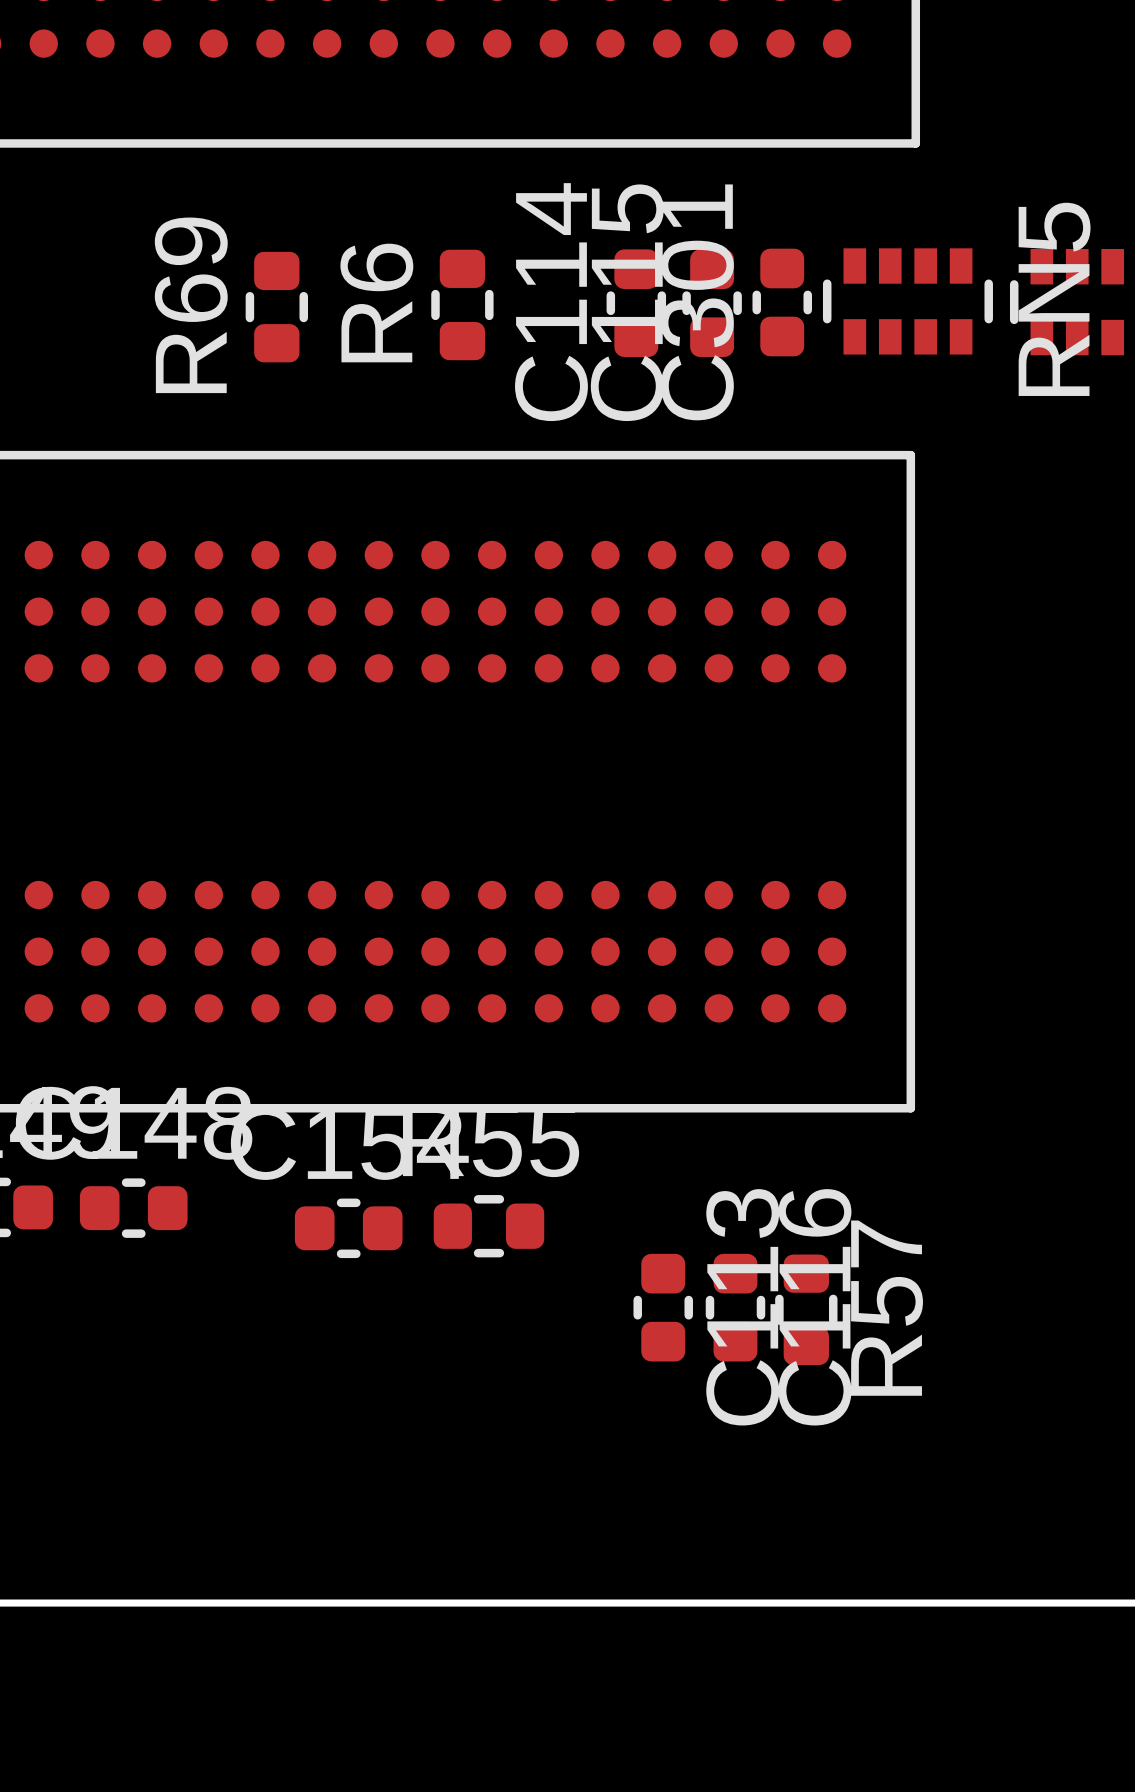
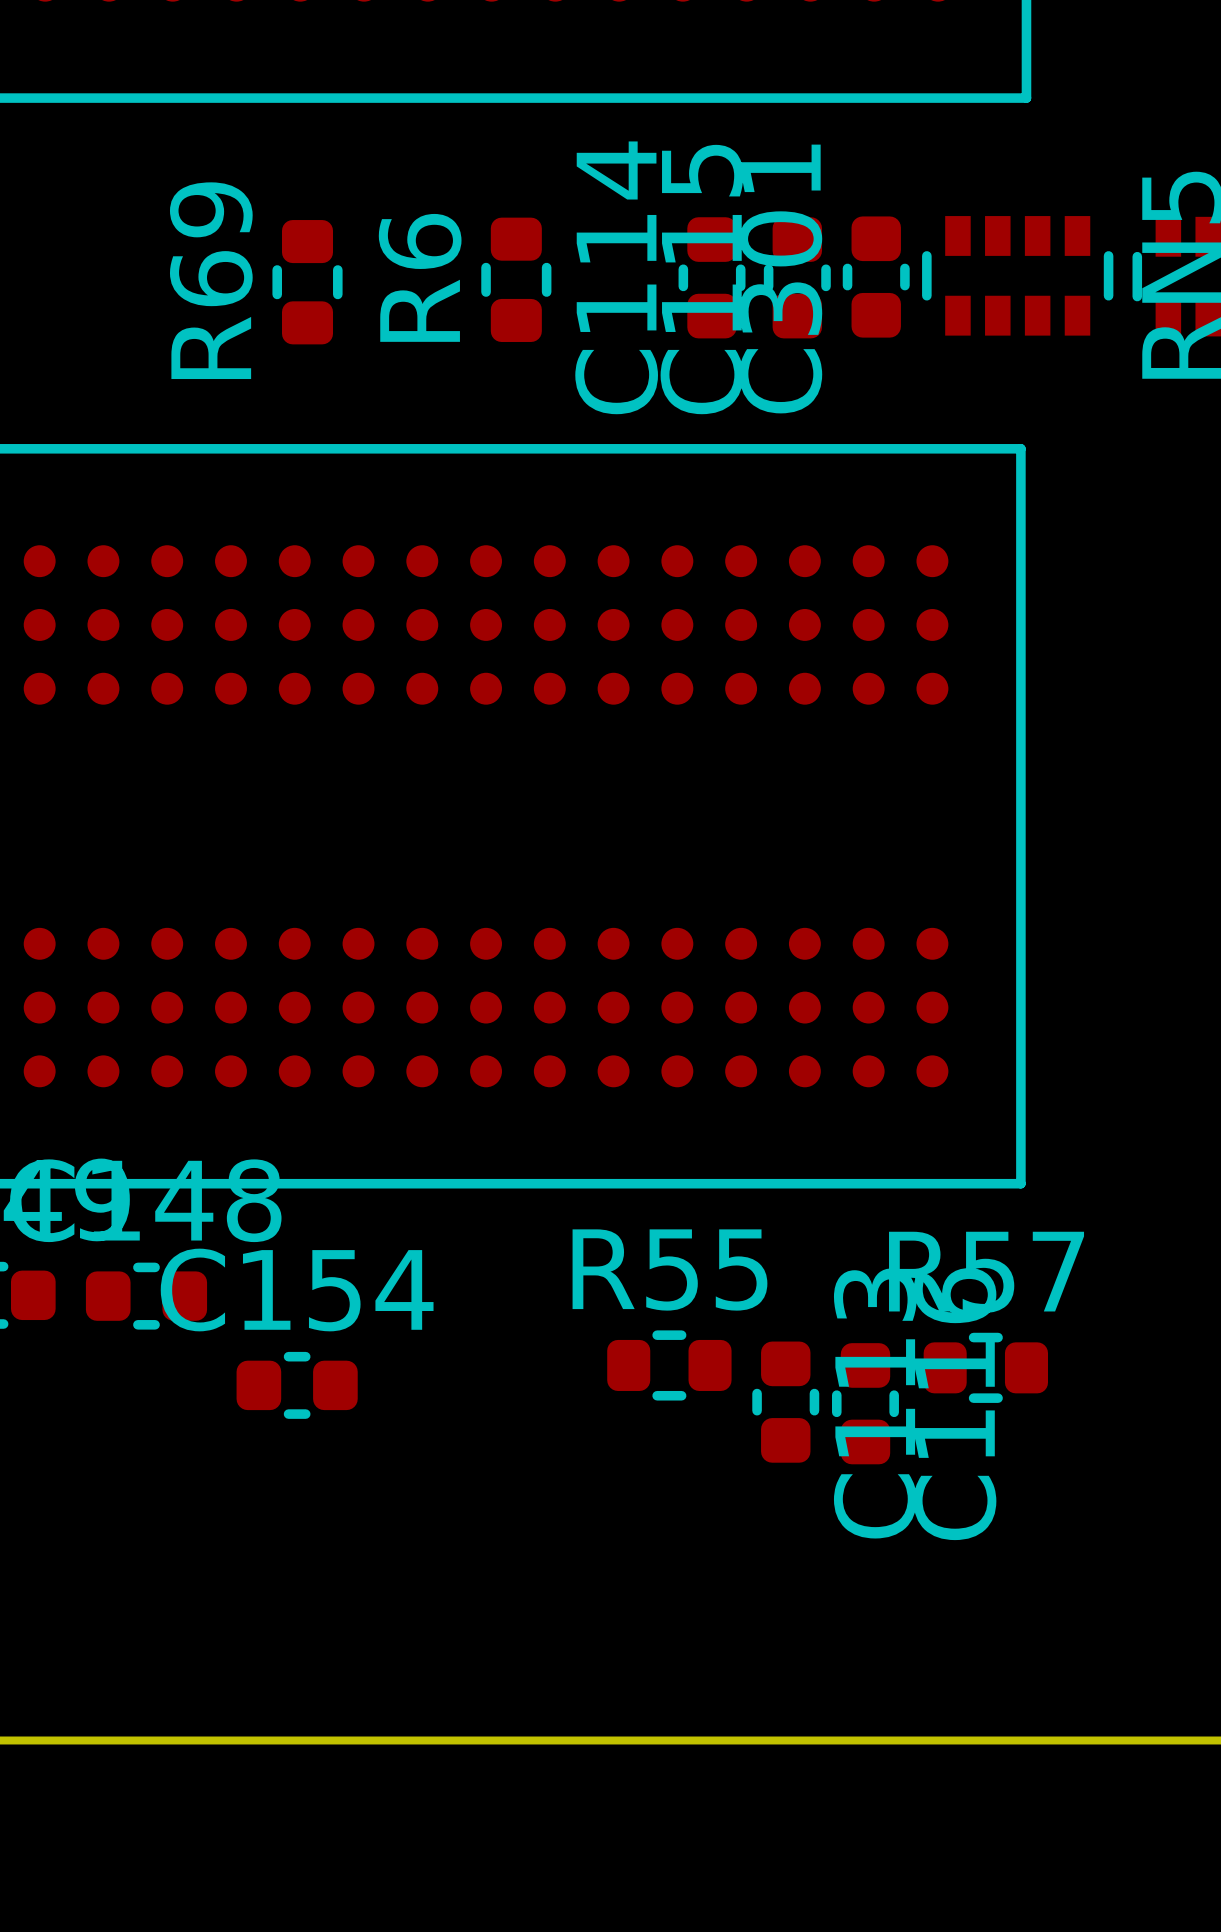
R55 position: (488, 1226) -> (669, 1365)
C154 position: (348, 1228) -> (297, 1385)
C113 position: (663, 1307) -> (785, 1402)
C116 position: (735, 1307) -> (865, 1403)
R57 rotation: 0° (806, 1309) -> 90° clockwise (985, 1367)
R57 position: (806, 1309) -> (985, 1367)

